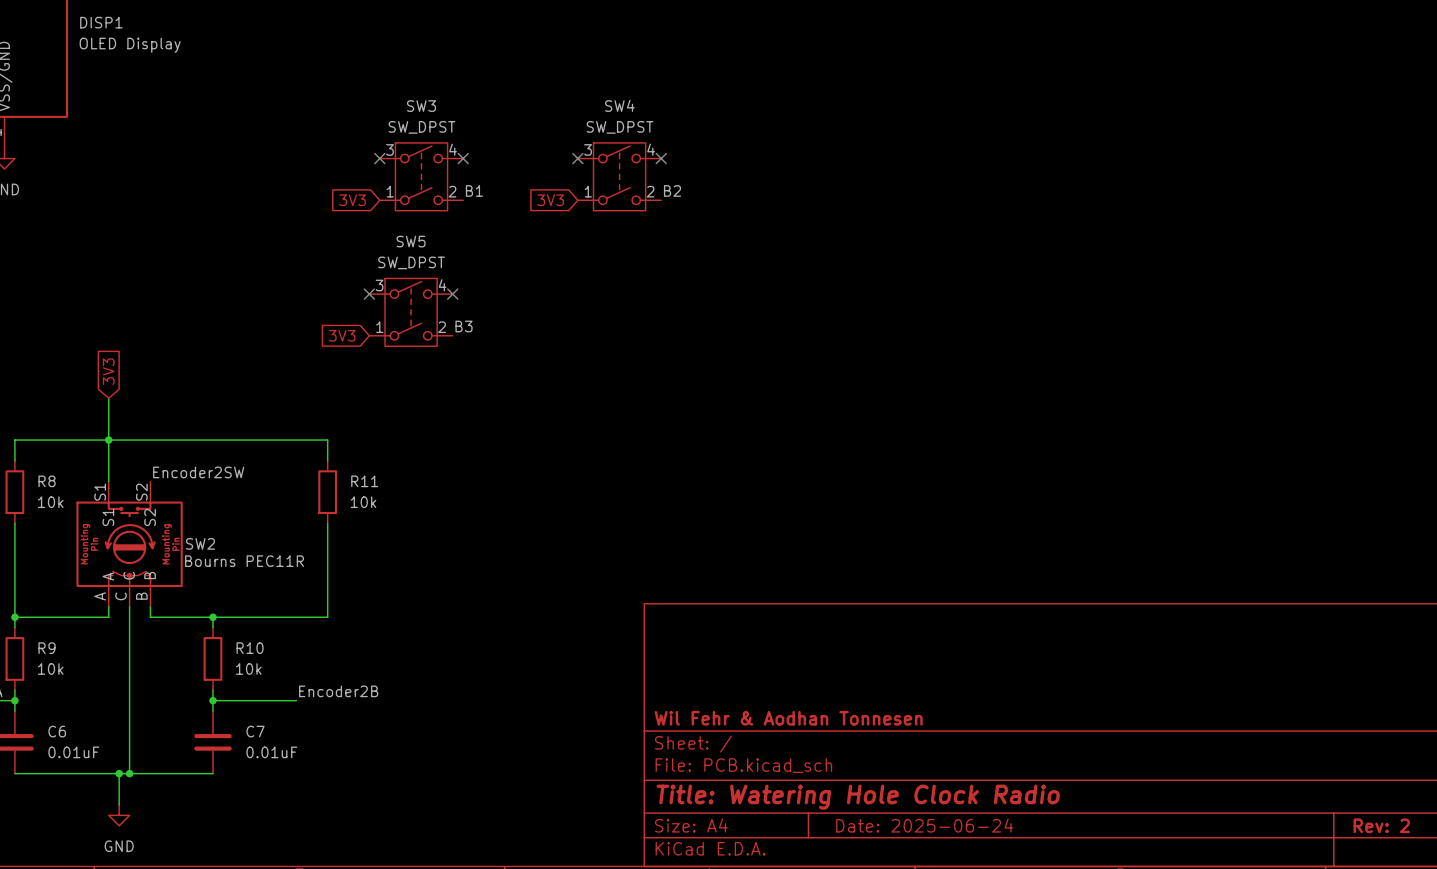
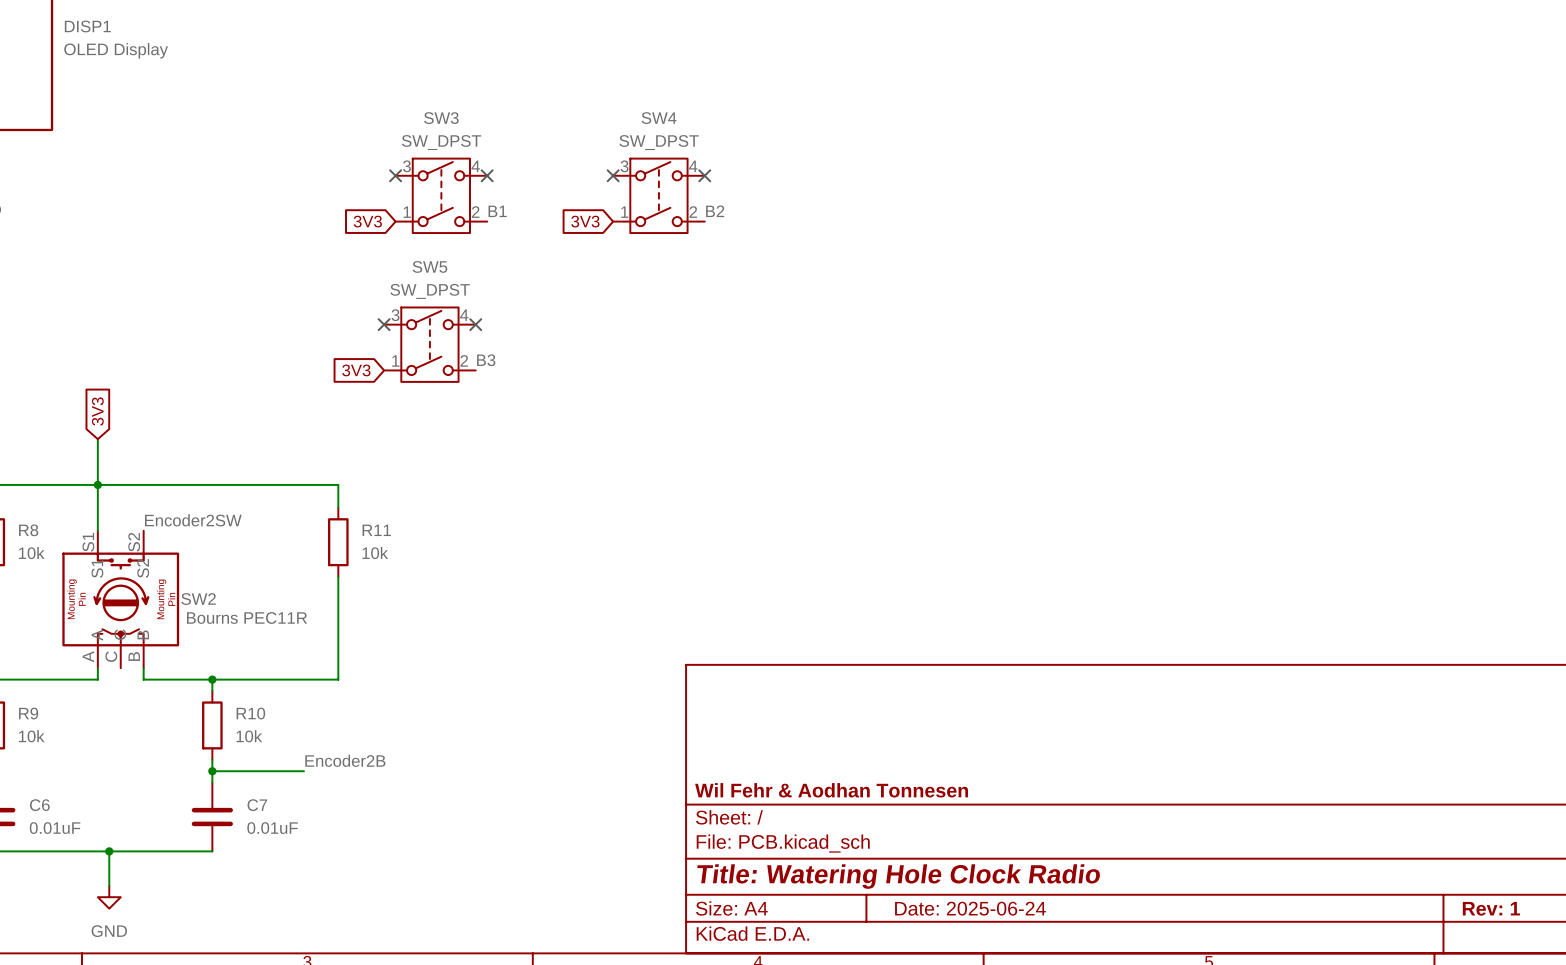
wire: (129, 606) (129, 773) -> none
junction: (129, 773) -> none
title block: Rev: 2 (1381, 825) -> Rev: 1 (1491, 908)

